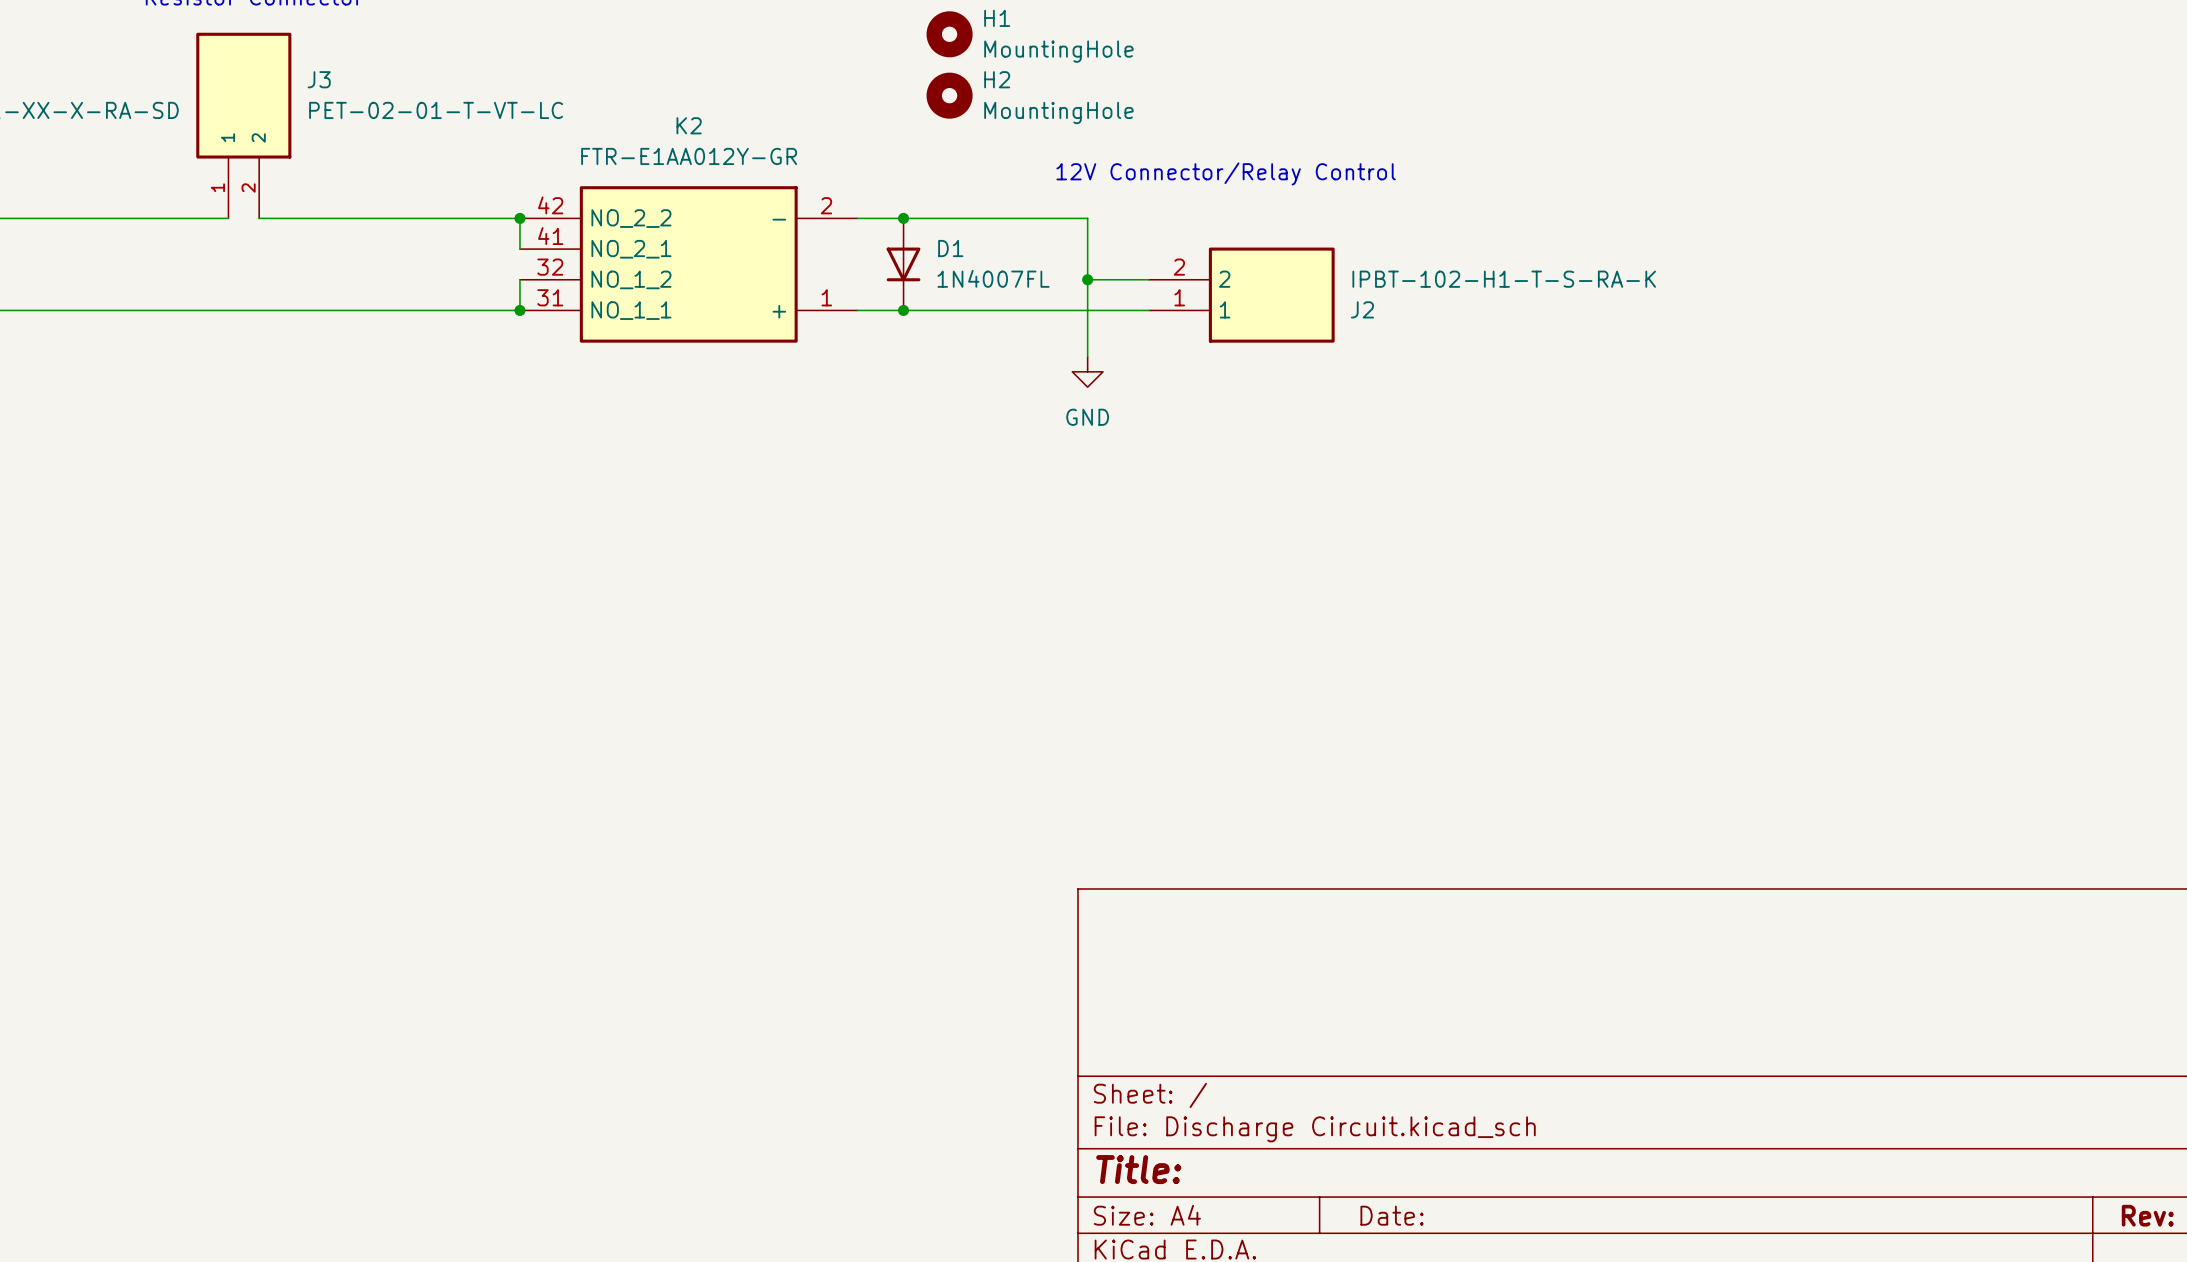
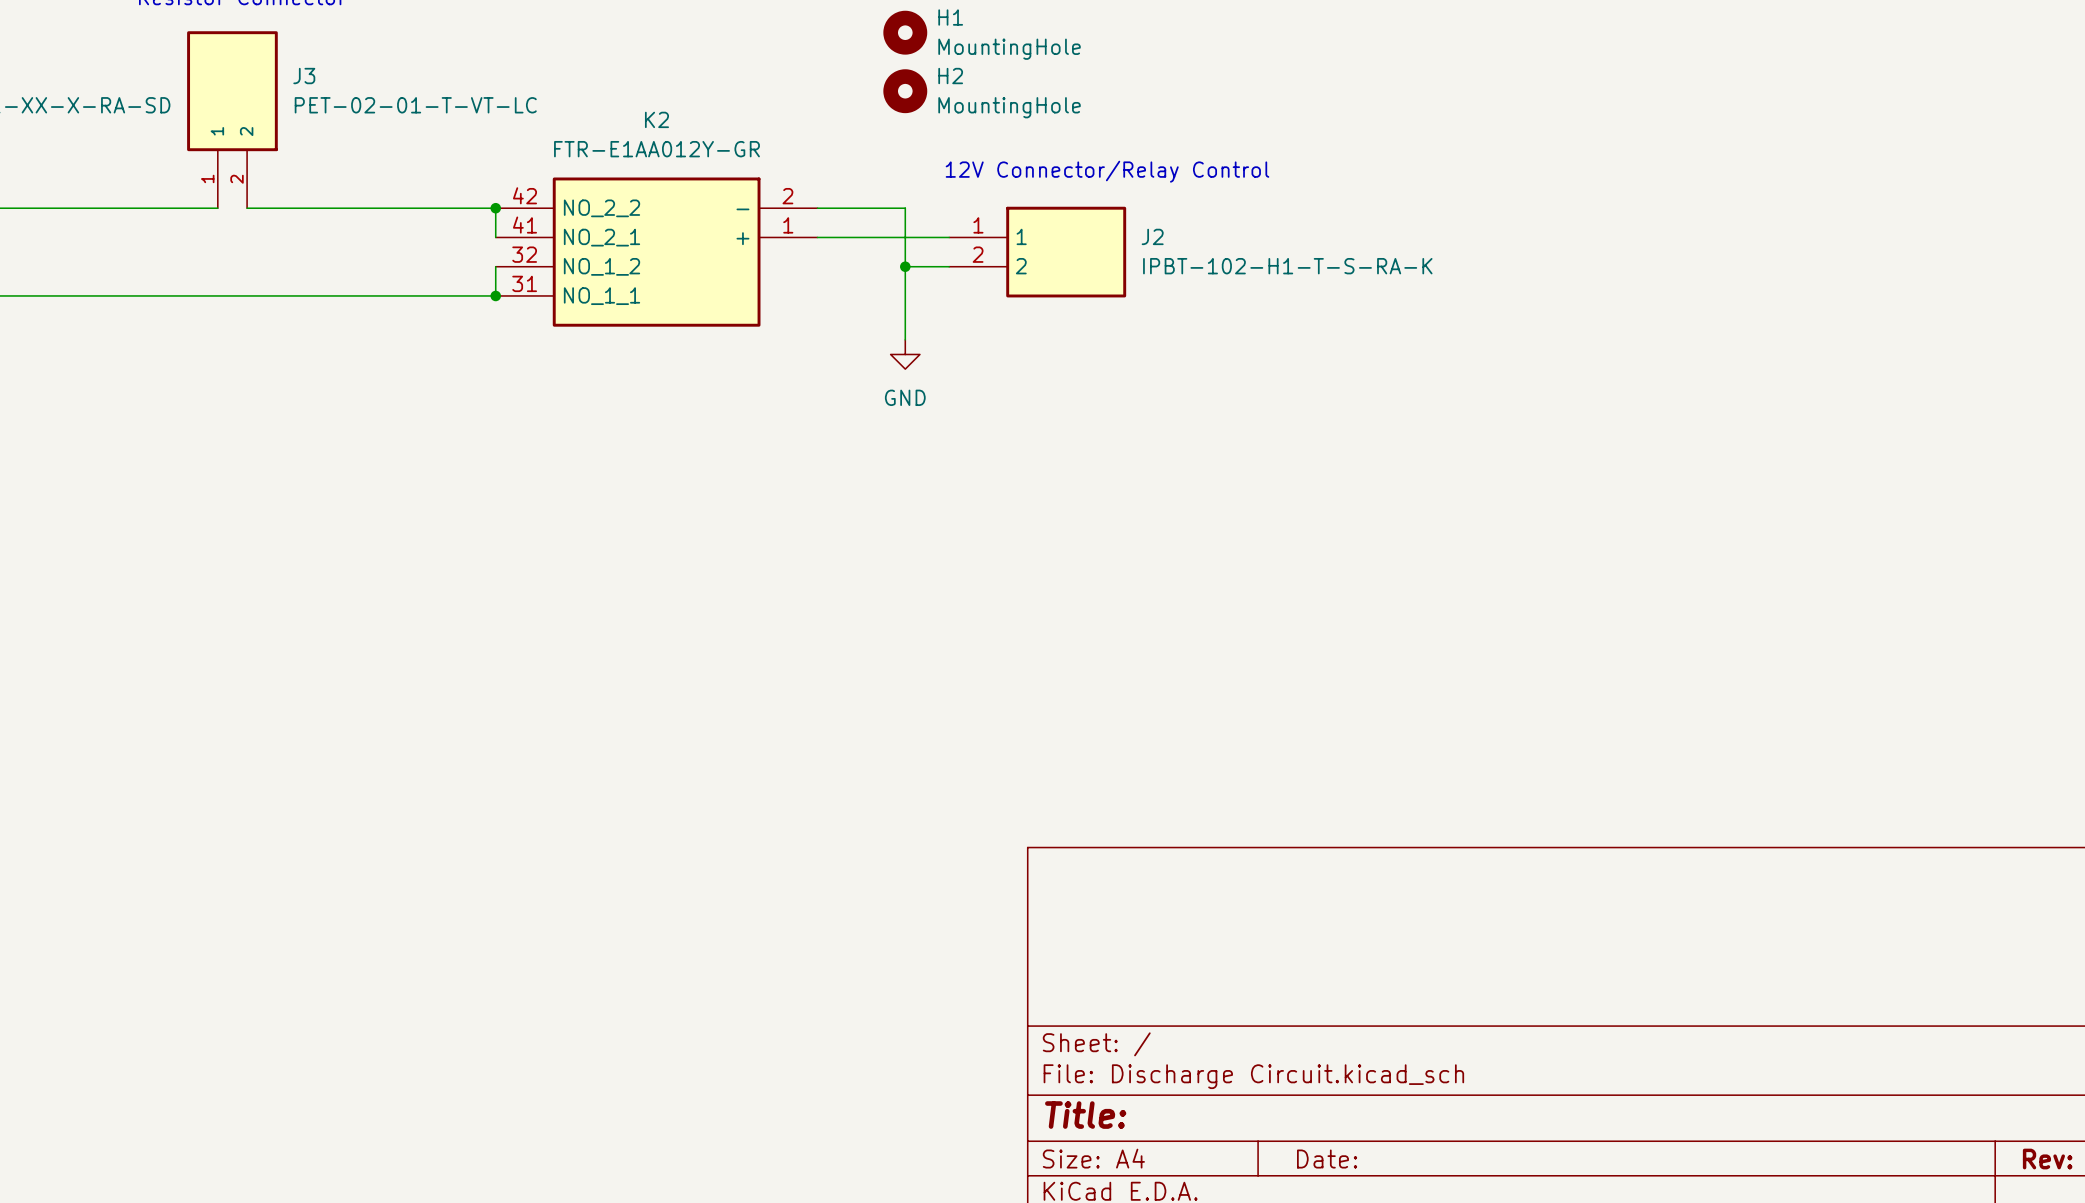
text position: 12V Connector/Relay Control (1226, 173) -> 12V Connector/Relay Control (1107, 171)
K2 symbol: [519, 186, 858, 343] -> [495, 177, 818, 327]
junction: (903, 218) -> none
wire: (949, 218) (1087, 218) (1087, 356) -> (905, 208) (905, 339)
wire: none -> (817, 237) (949, 237)
D1: 1N4007FL (903, 264) -> none
wire: none -> (905, 266) (949, 266)
junction: none -> (905, 266)
junction: (1087, 279) -> none
J2 position: (1241, 295) -> (1037, 252)
J2 flip: as is (1271, 295) -> up-down (1066, 252)
wire: (857, 310) (1149, 310) -> none
junction: (903, 310) -> none
power symbol position: GND (1087, 371) -> GND (905, 354)

